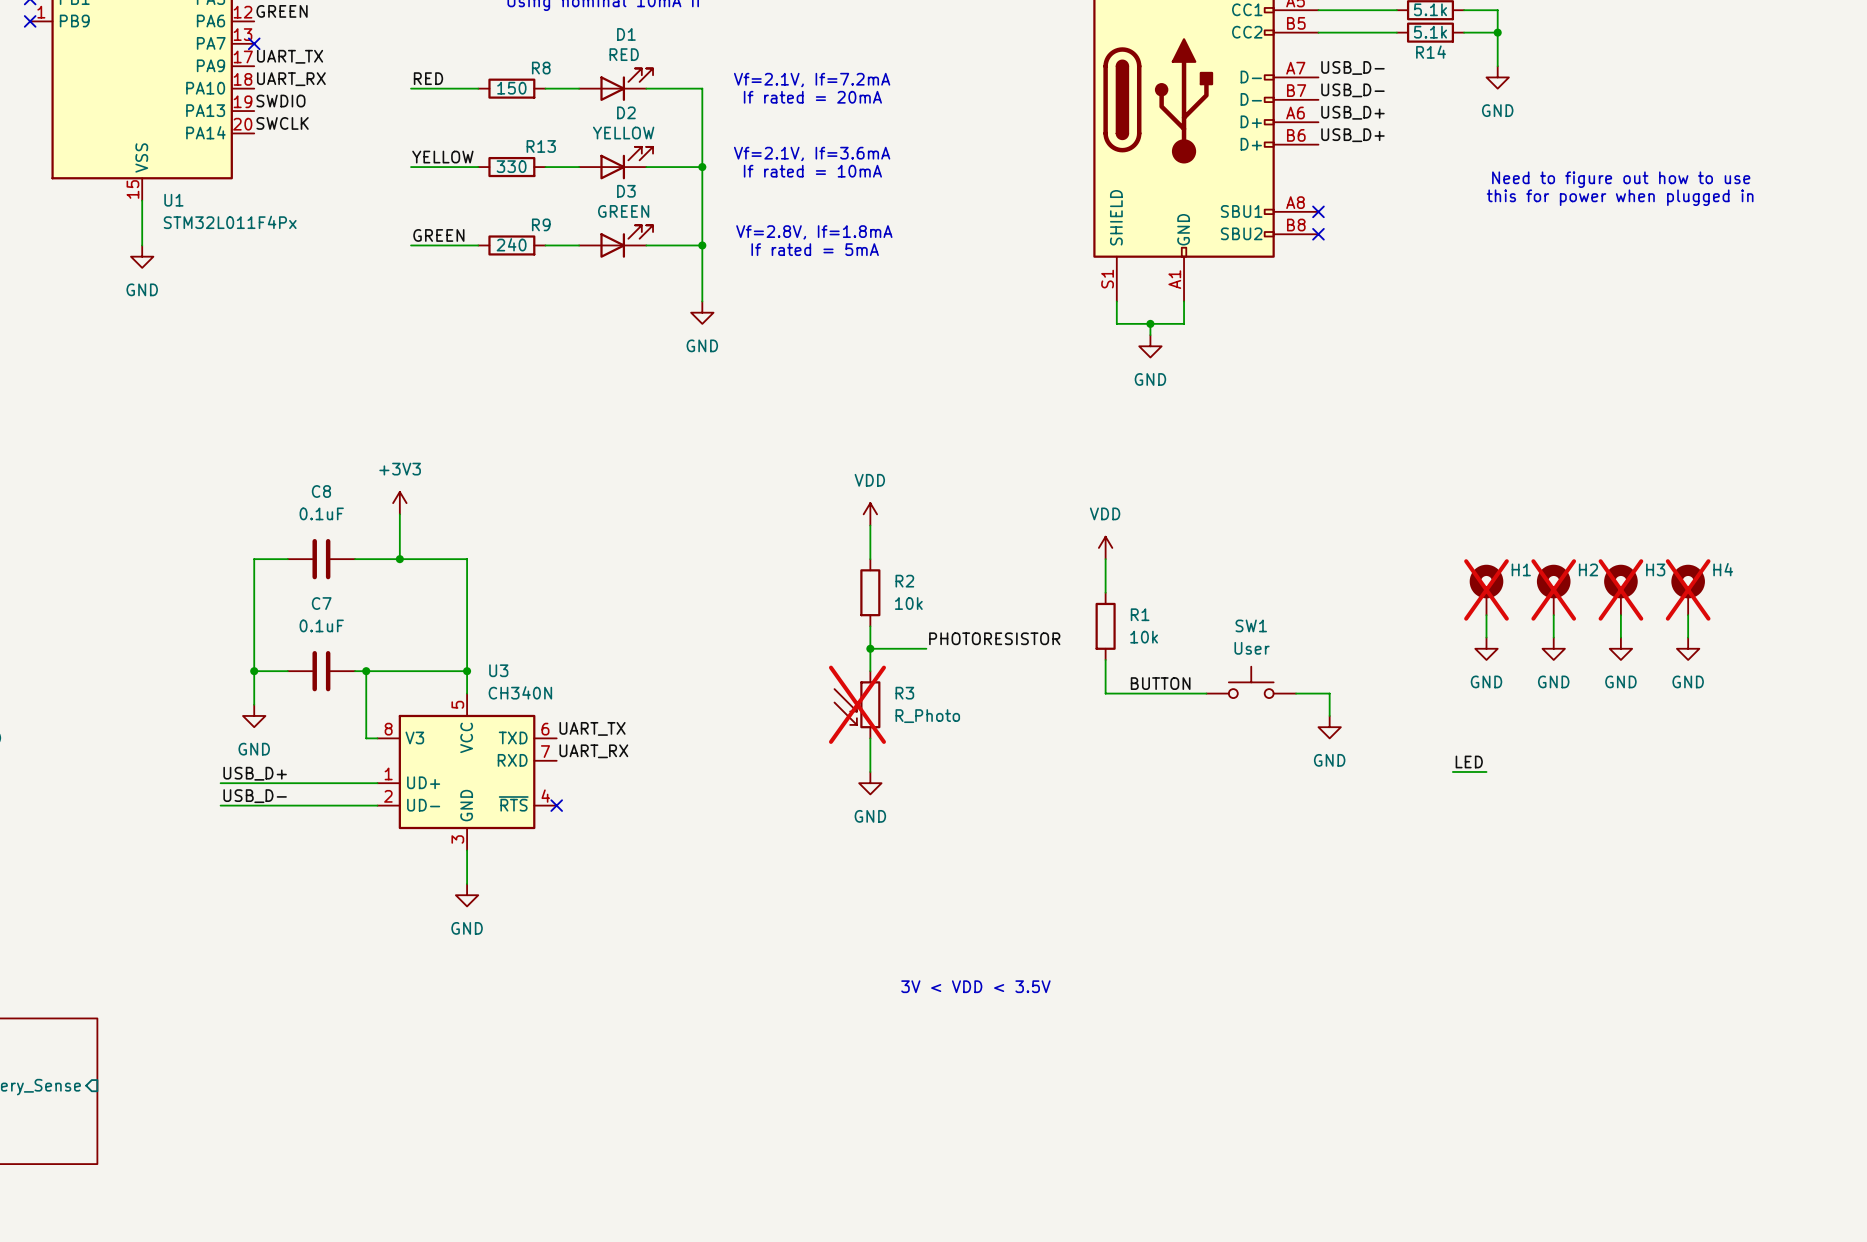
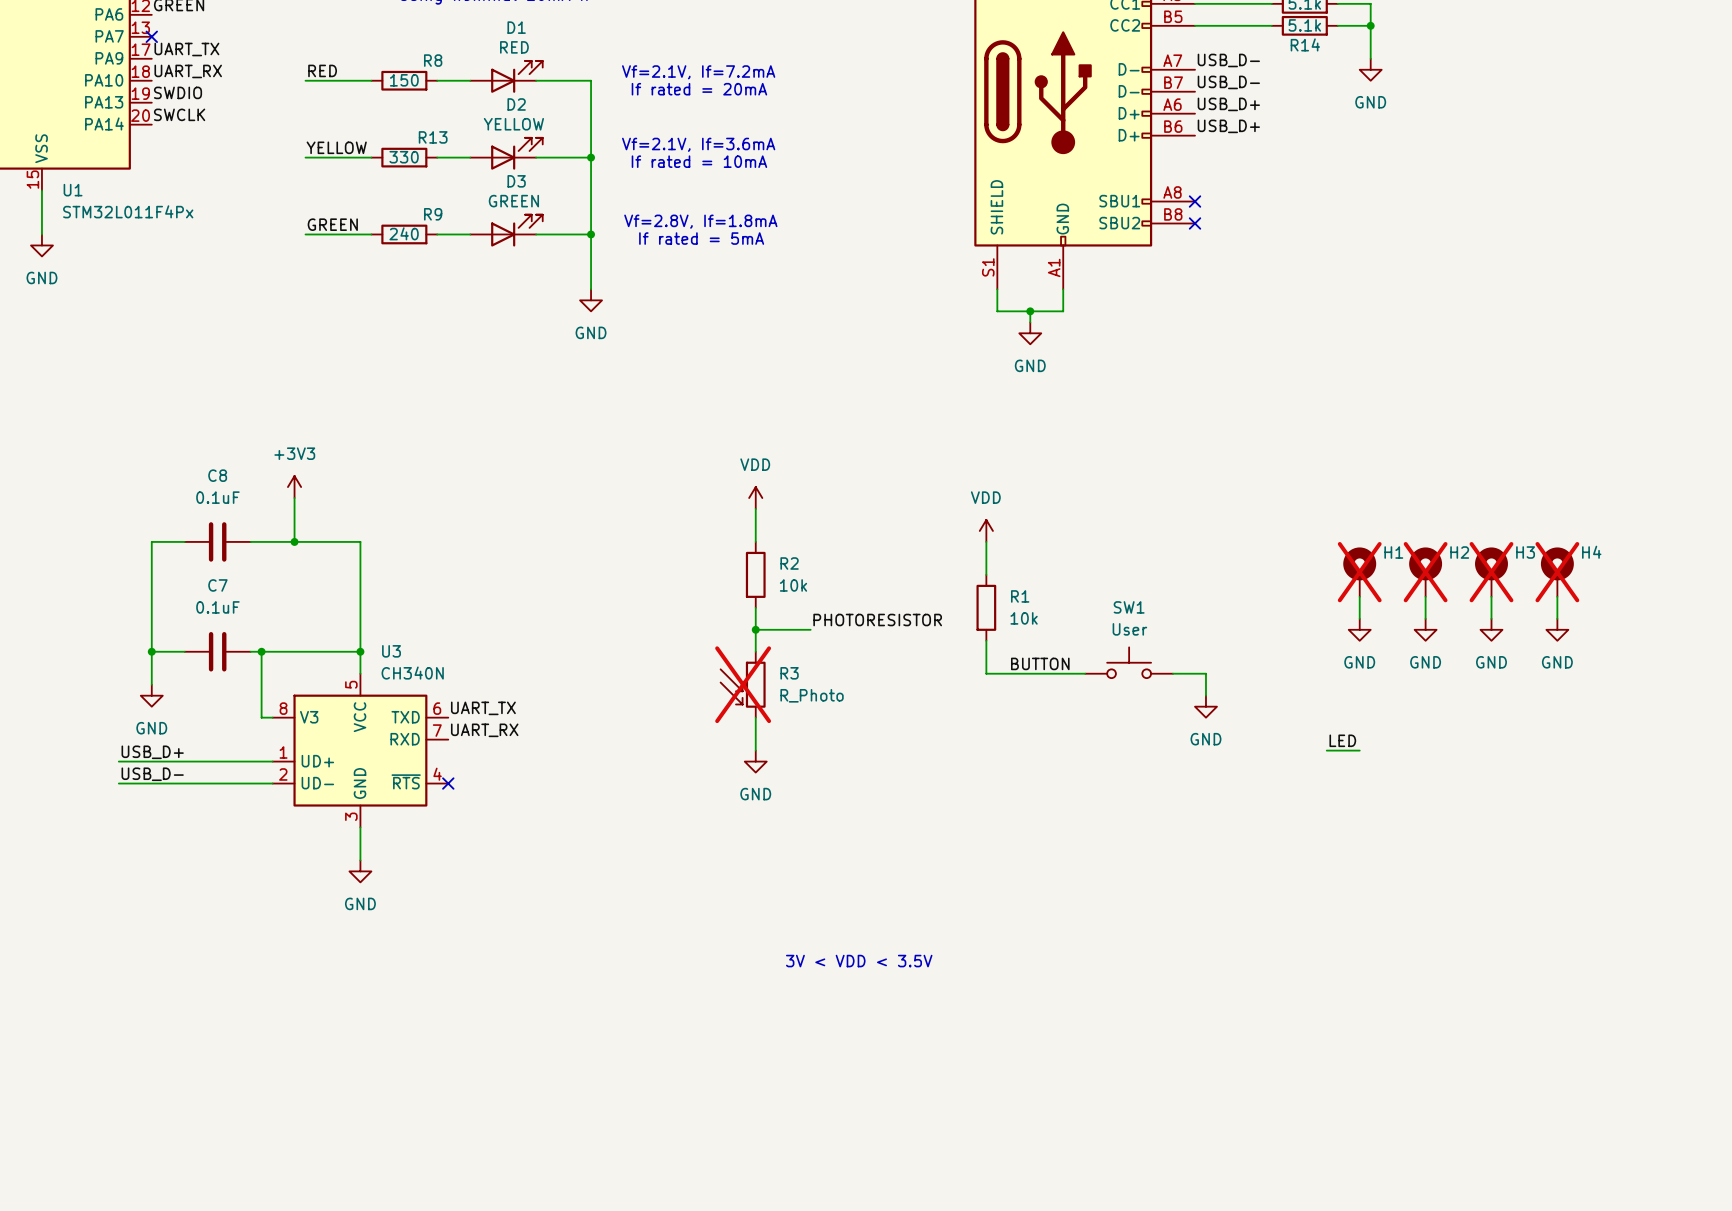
text: Need to figure out how to use (1621, 179) -> none
text: this for power when plugged in (1620, 197) -> none

